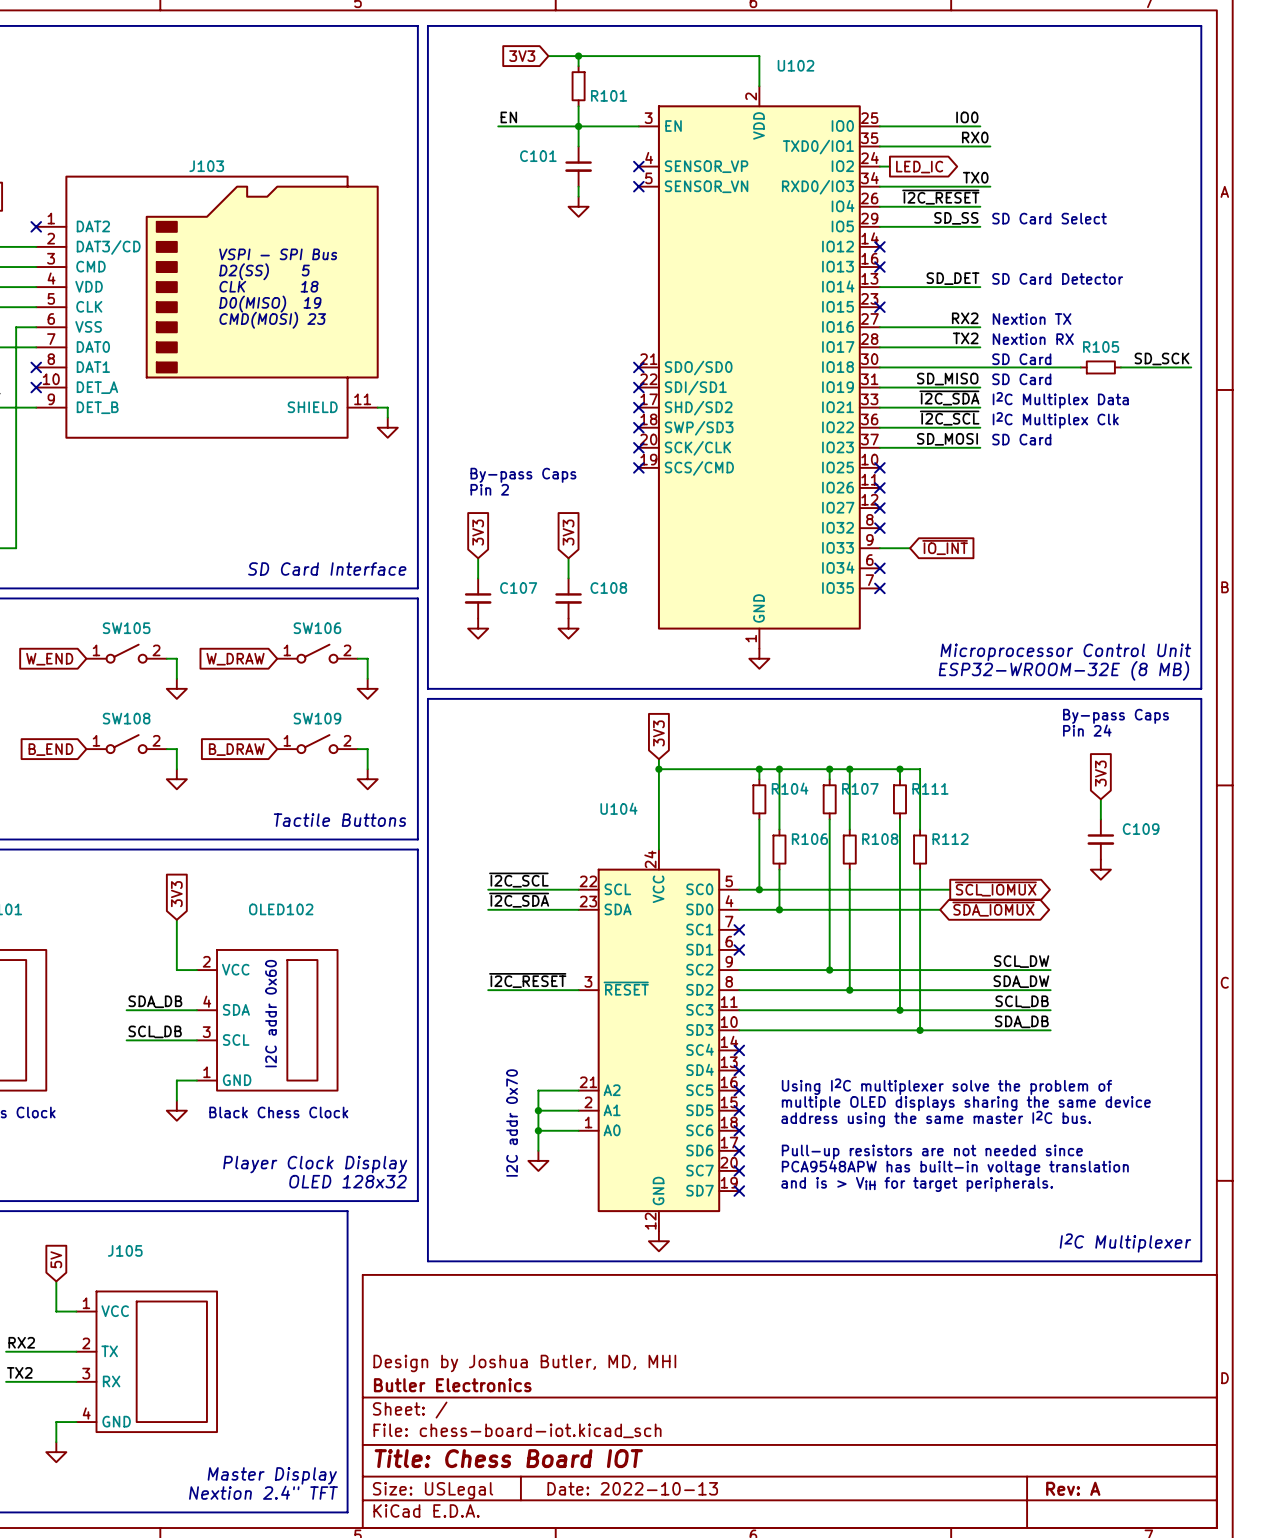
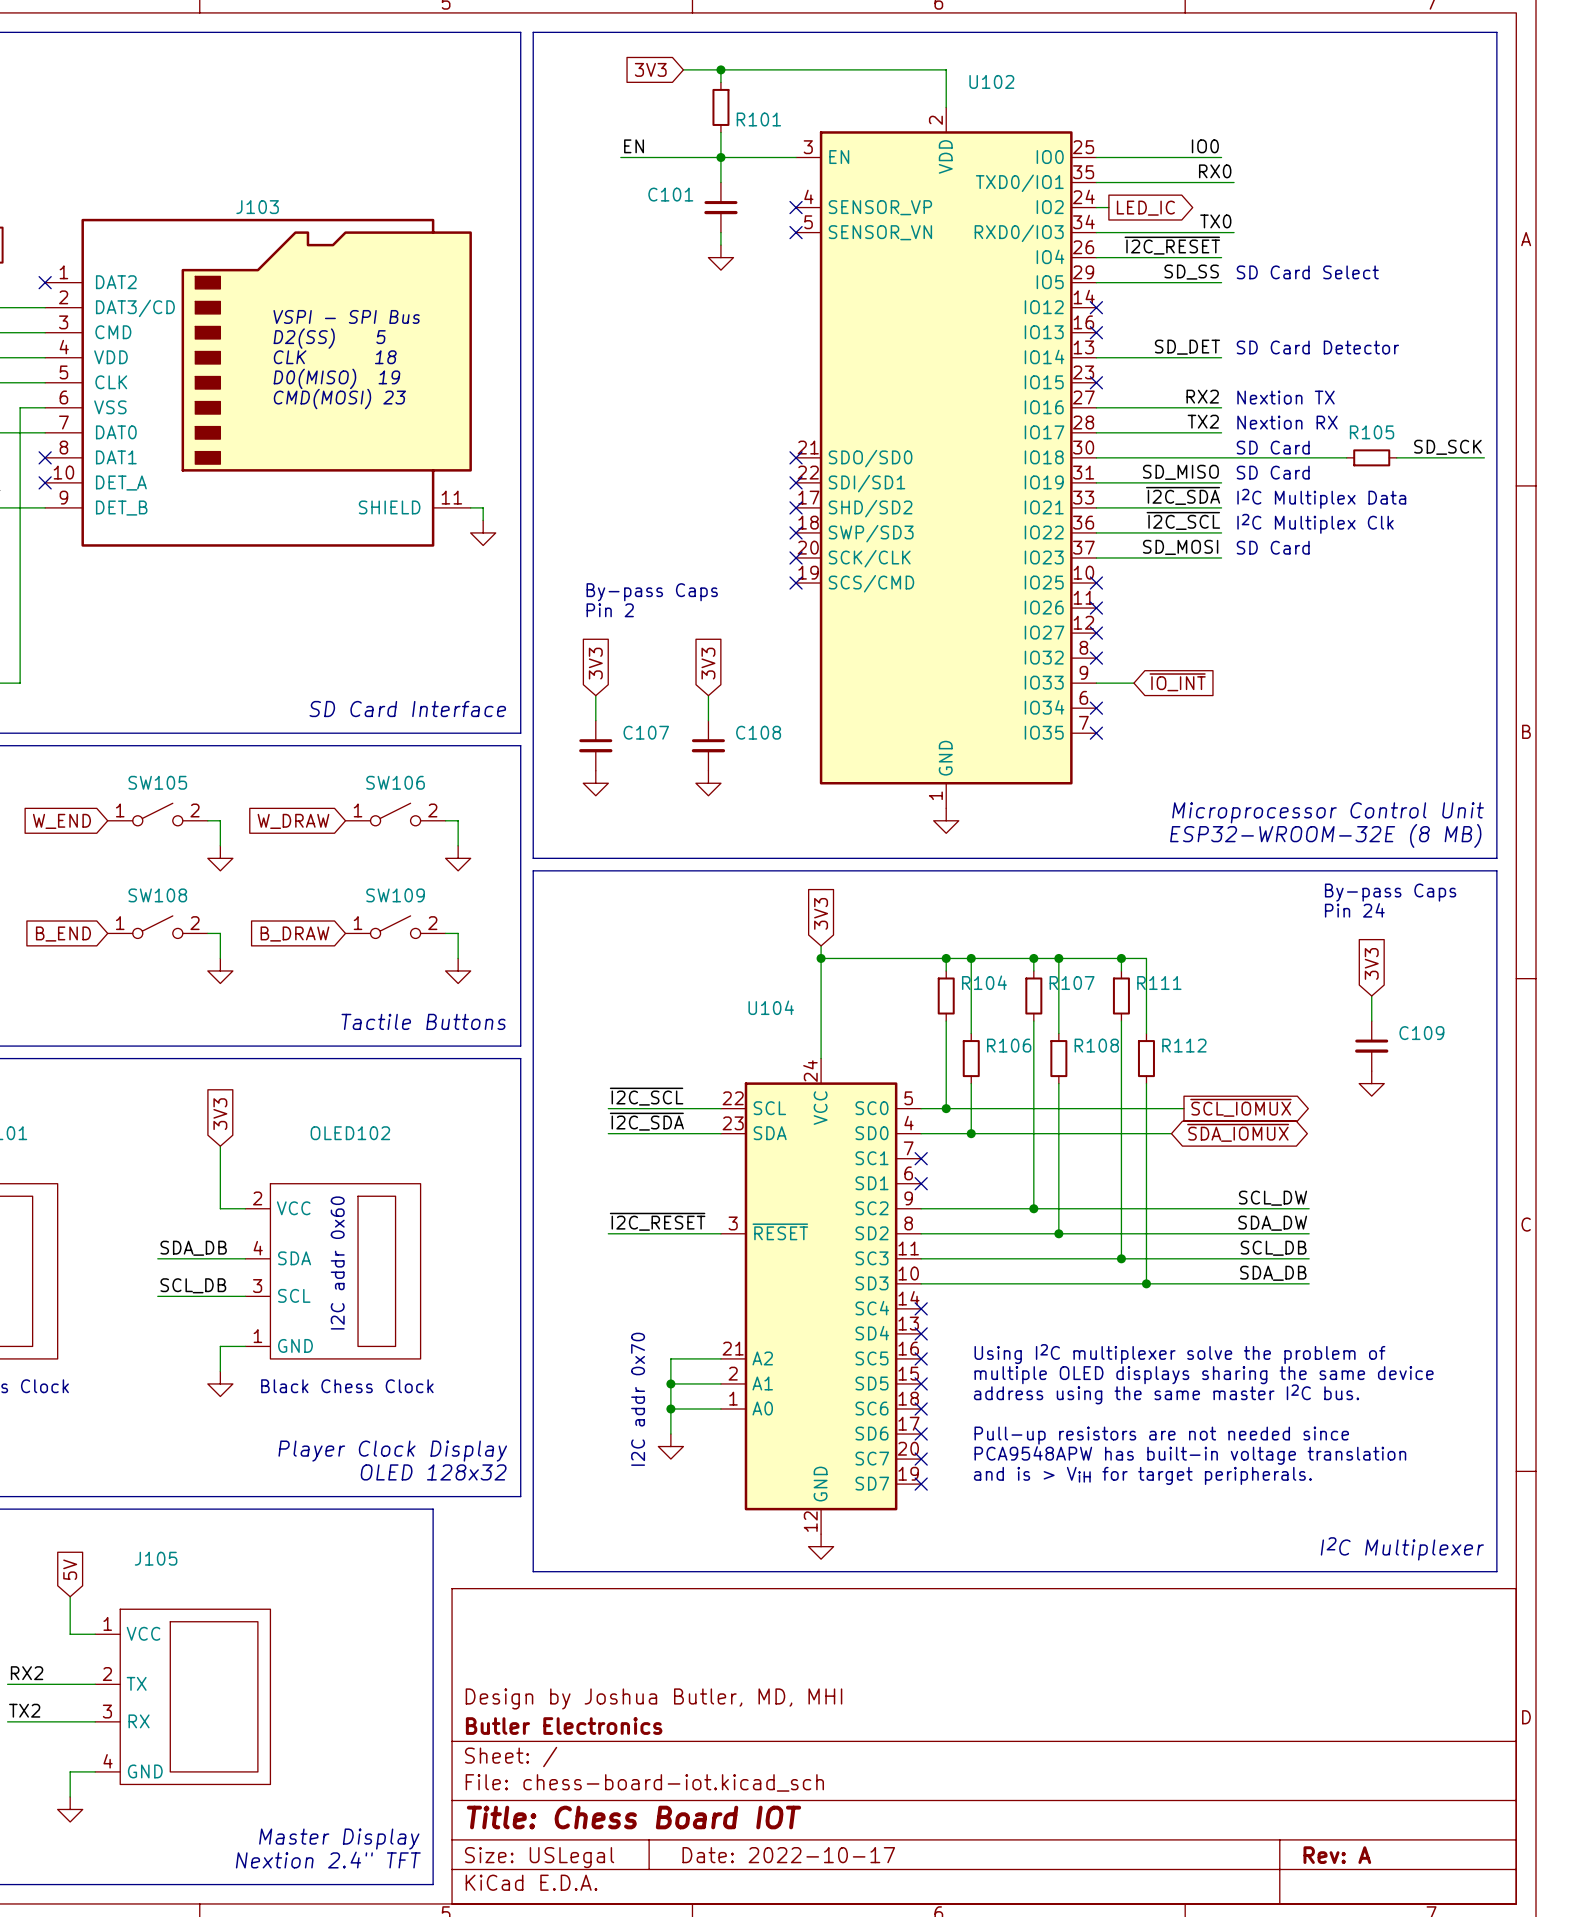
title block: Date: 2022-10-13 (632, 1488) -> Date: 2022-10-17 (788, 1855)

